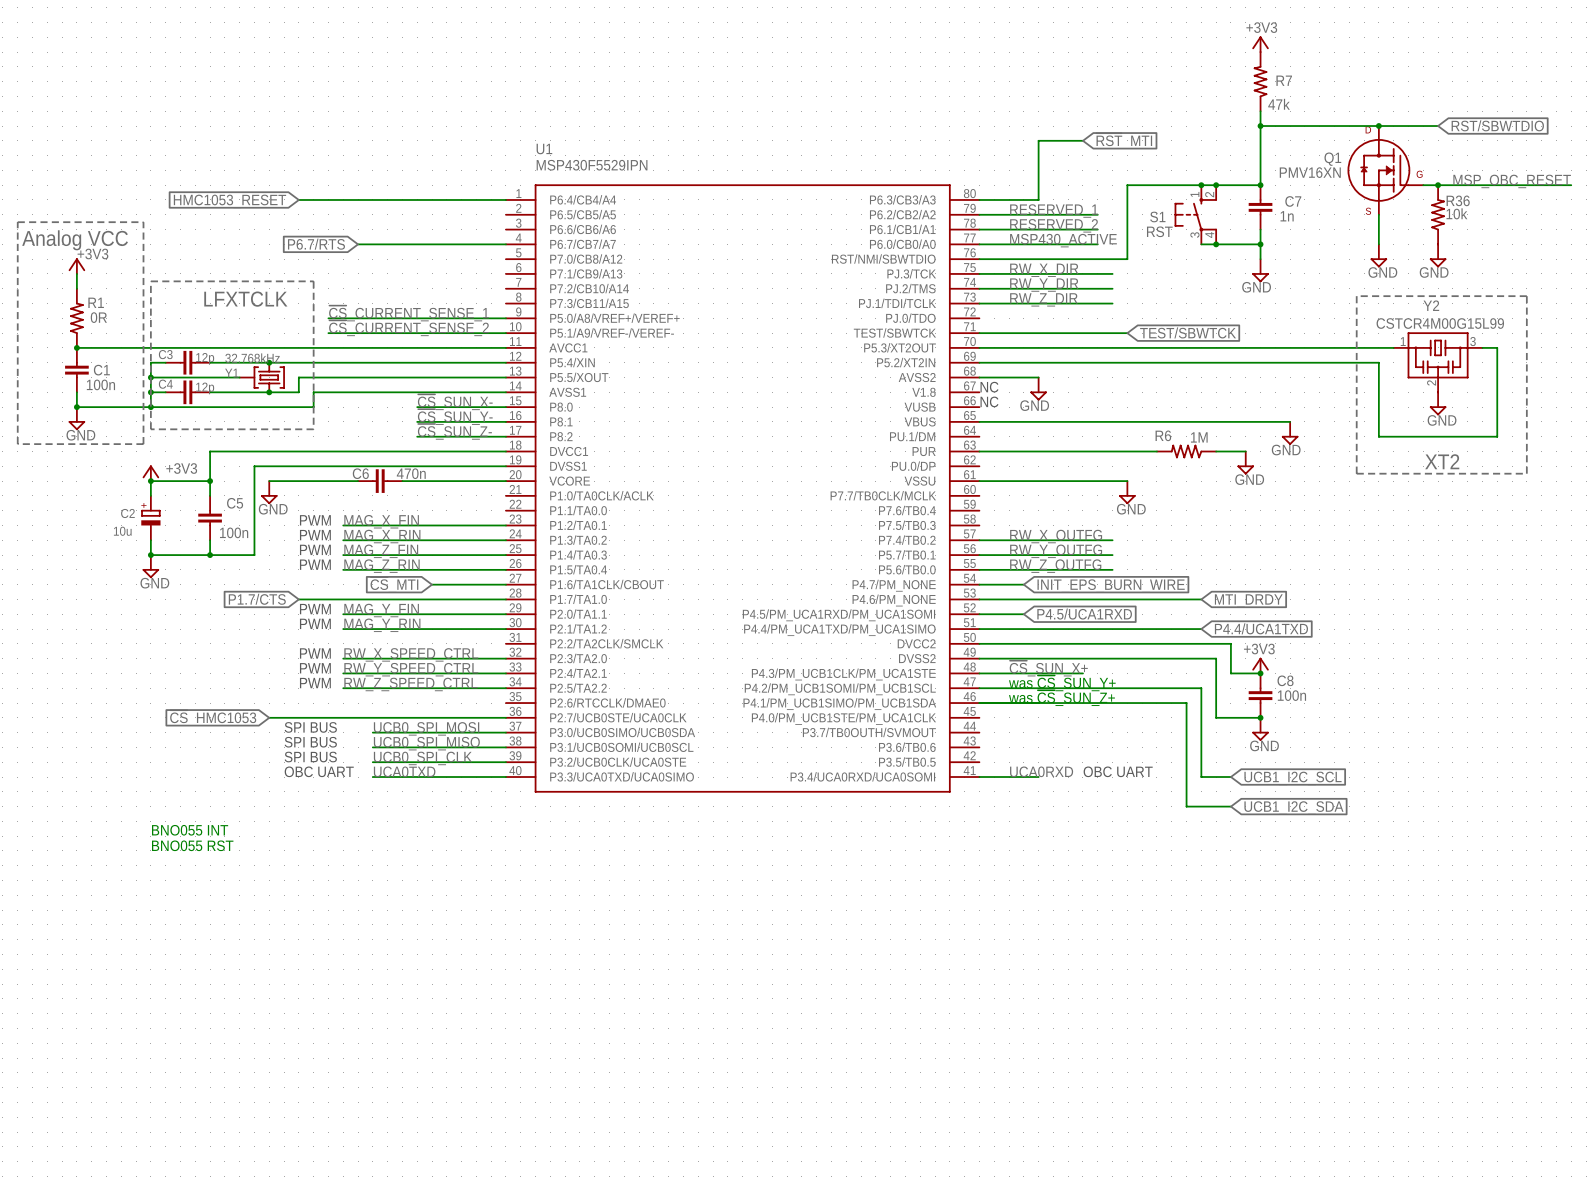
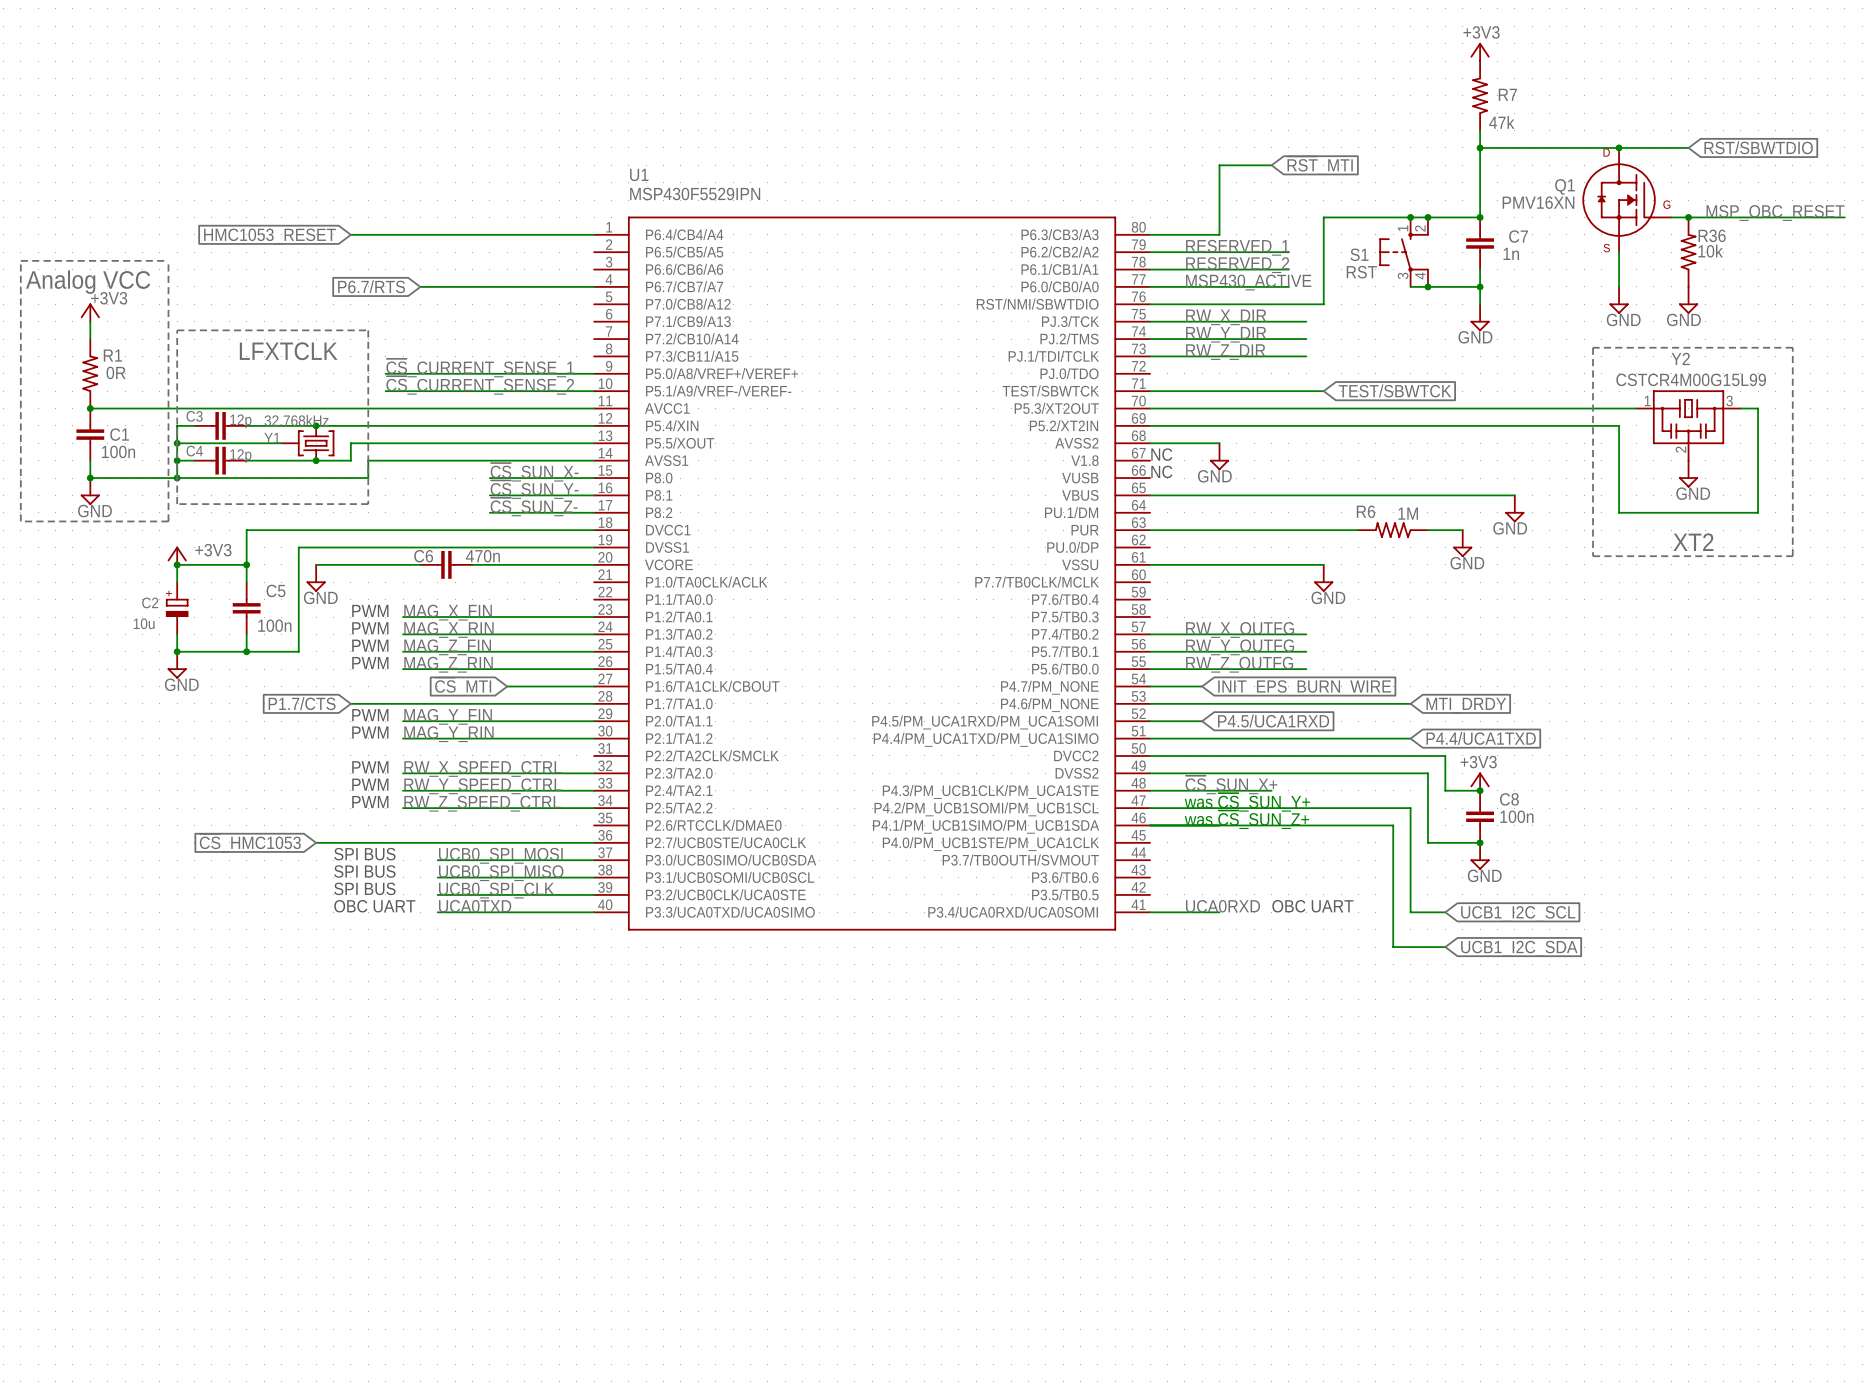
text: BNO055 INT (190, 830) -> none
text: BNO055 RST (192, 845) -> none

